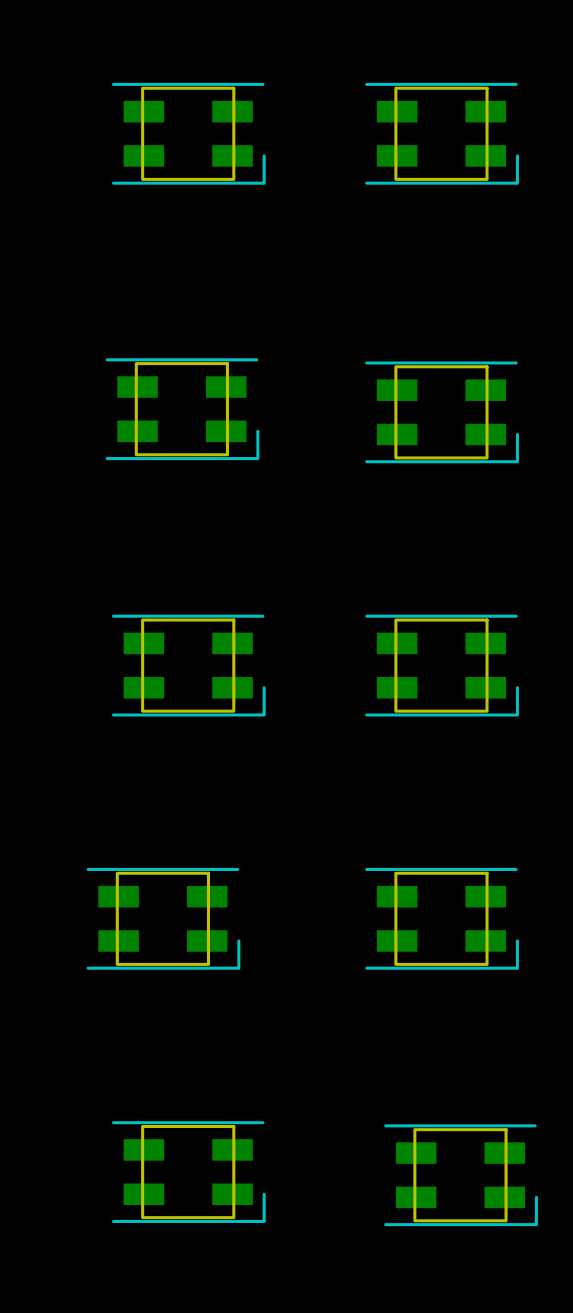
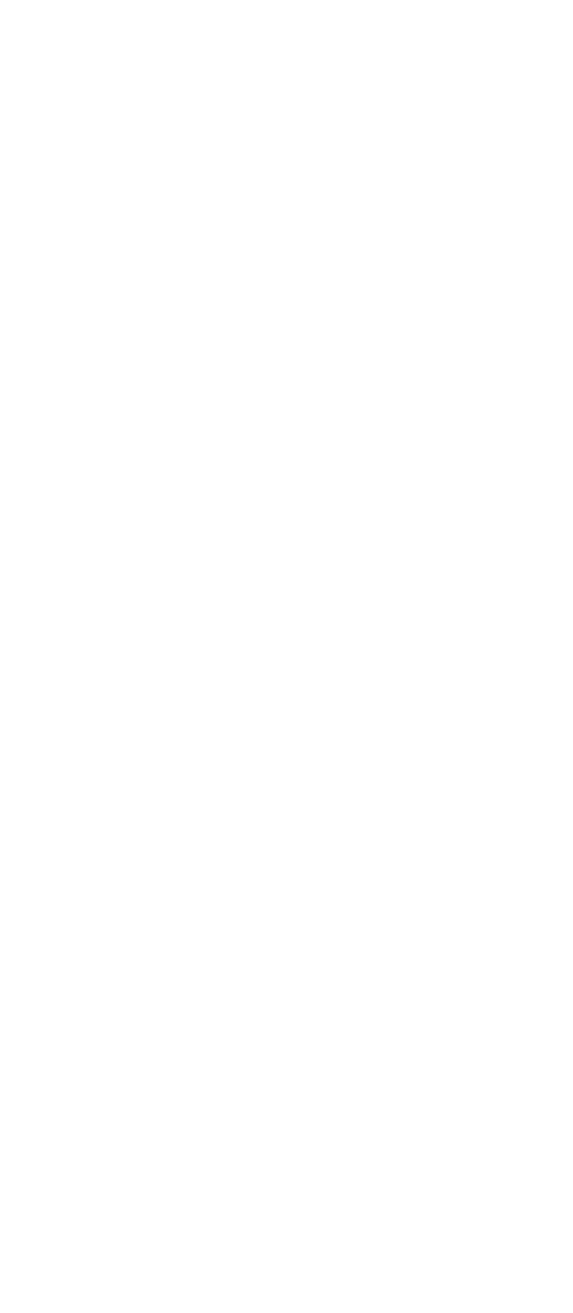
part: (188, 133) -> none
part: (442, 133) -> none
part: (182, 409) -> none
part: (442, 412) -> none
part: (188, 665) -> none
part: (442, 665) -> none
part: (163, 918) -> none
part: (442, 918) -> none
part: (188, 1172) -> none
part: (461, 1175) -> none

